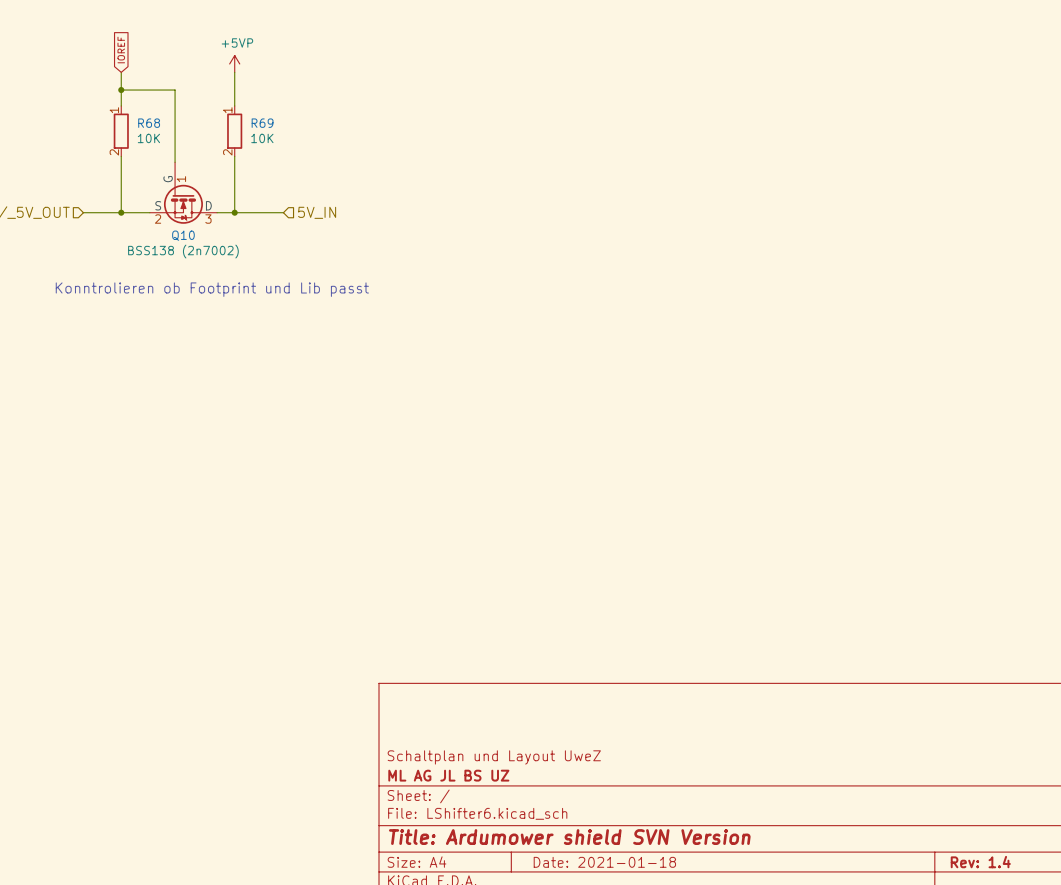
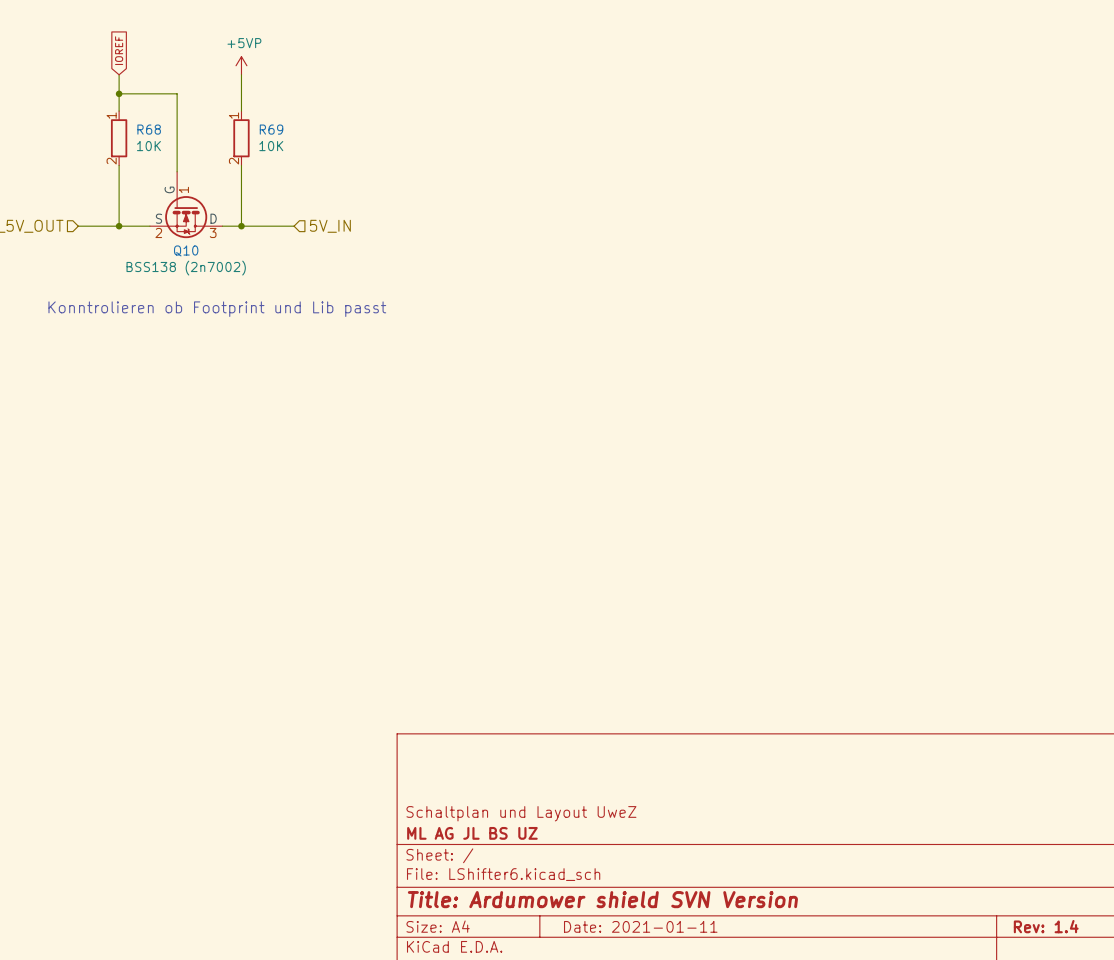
title block: Date: 2021-01-18 (604, 862) -> Date: 2021-01-11 (640, 926)

